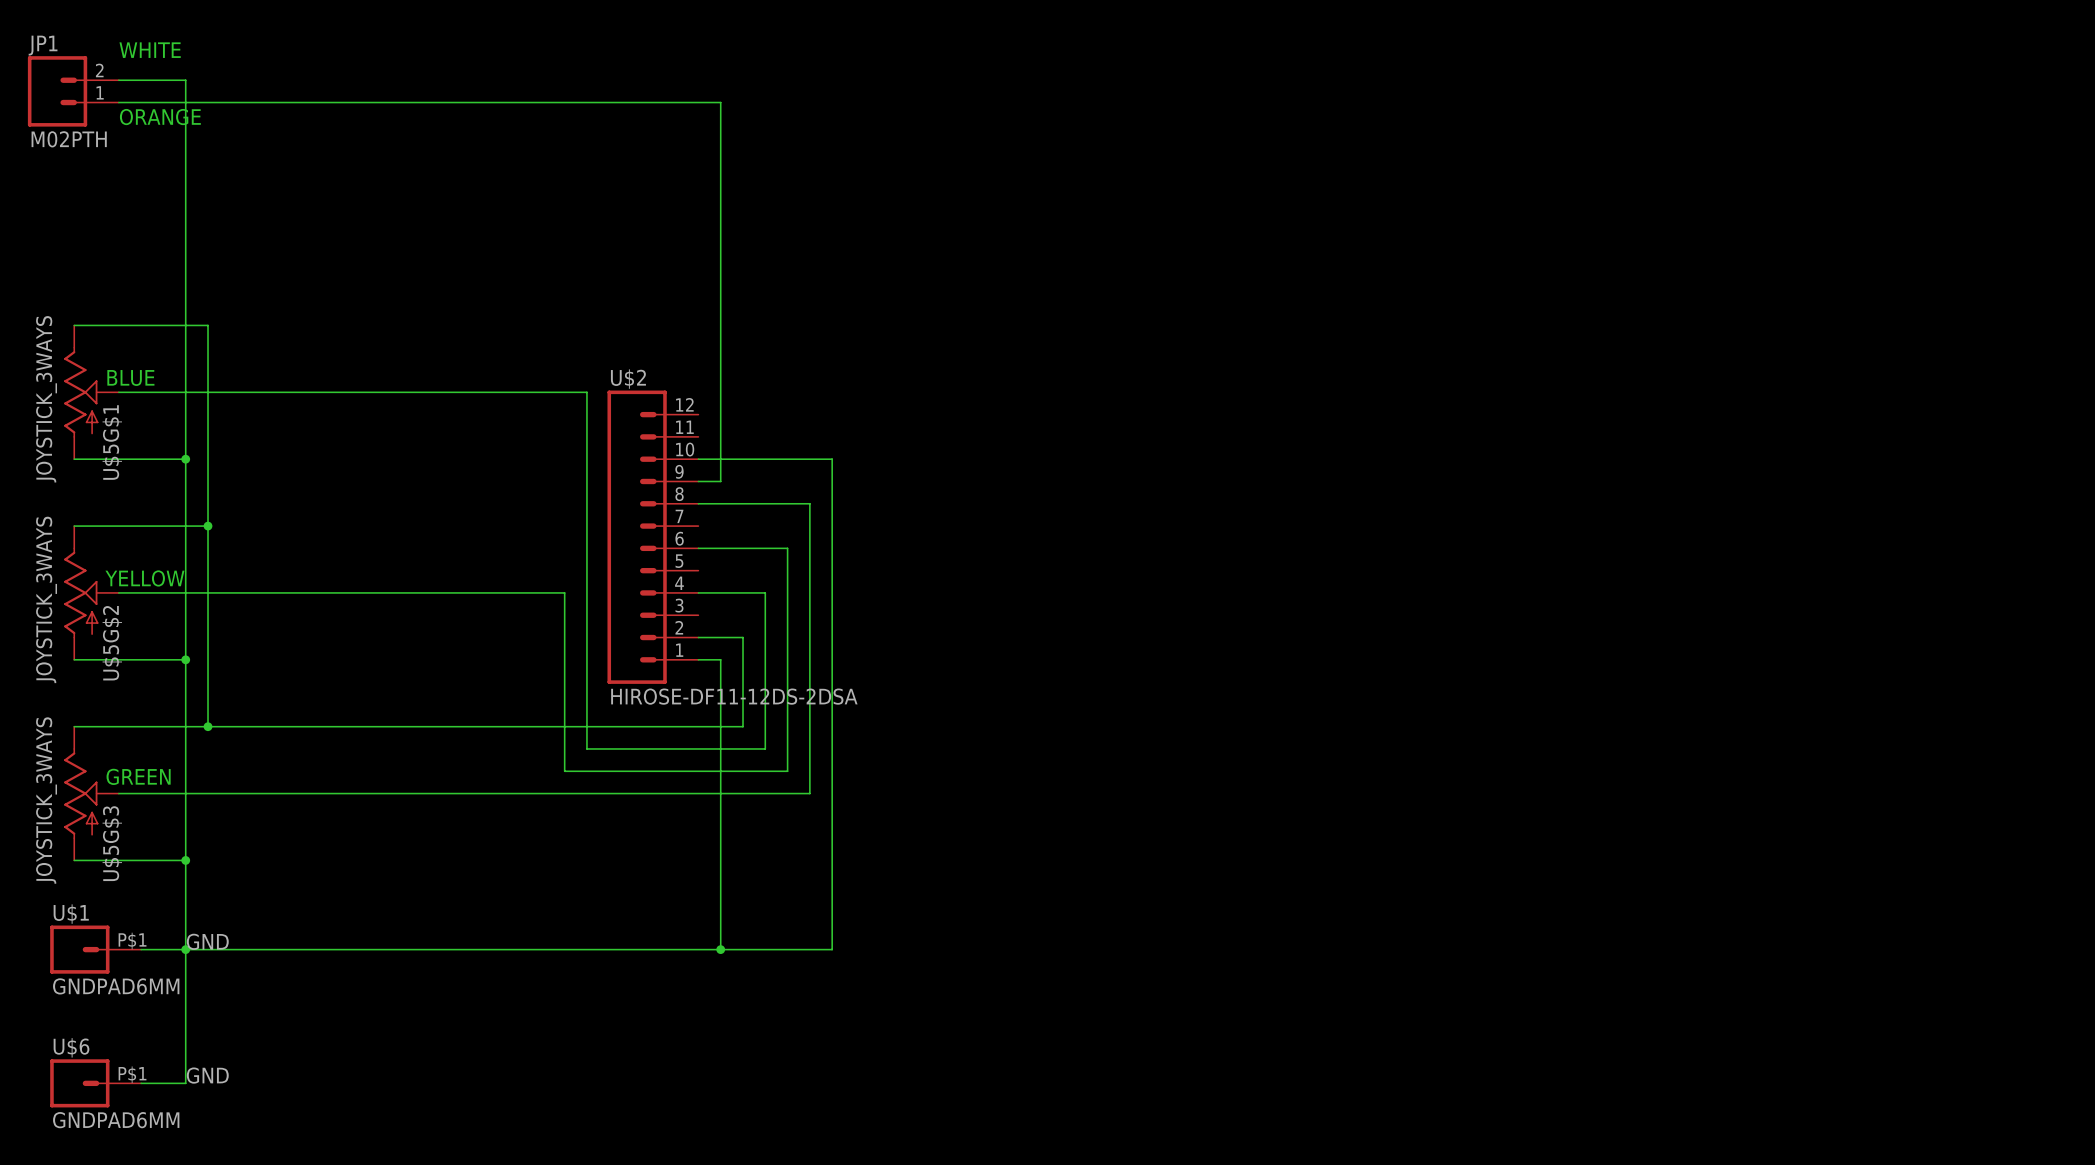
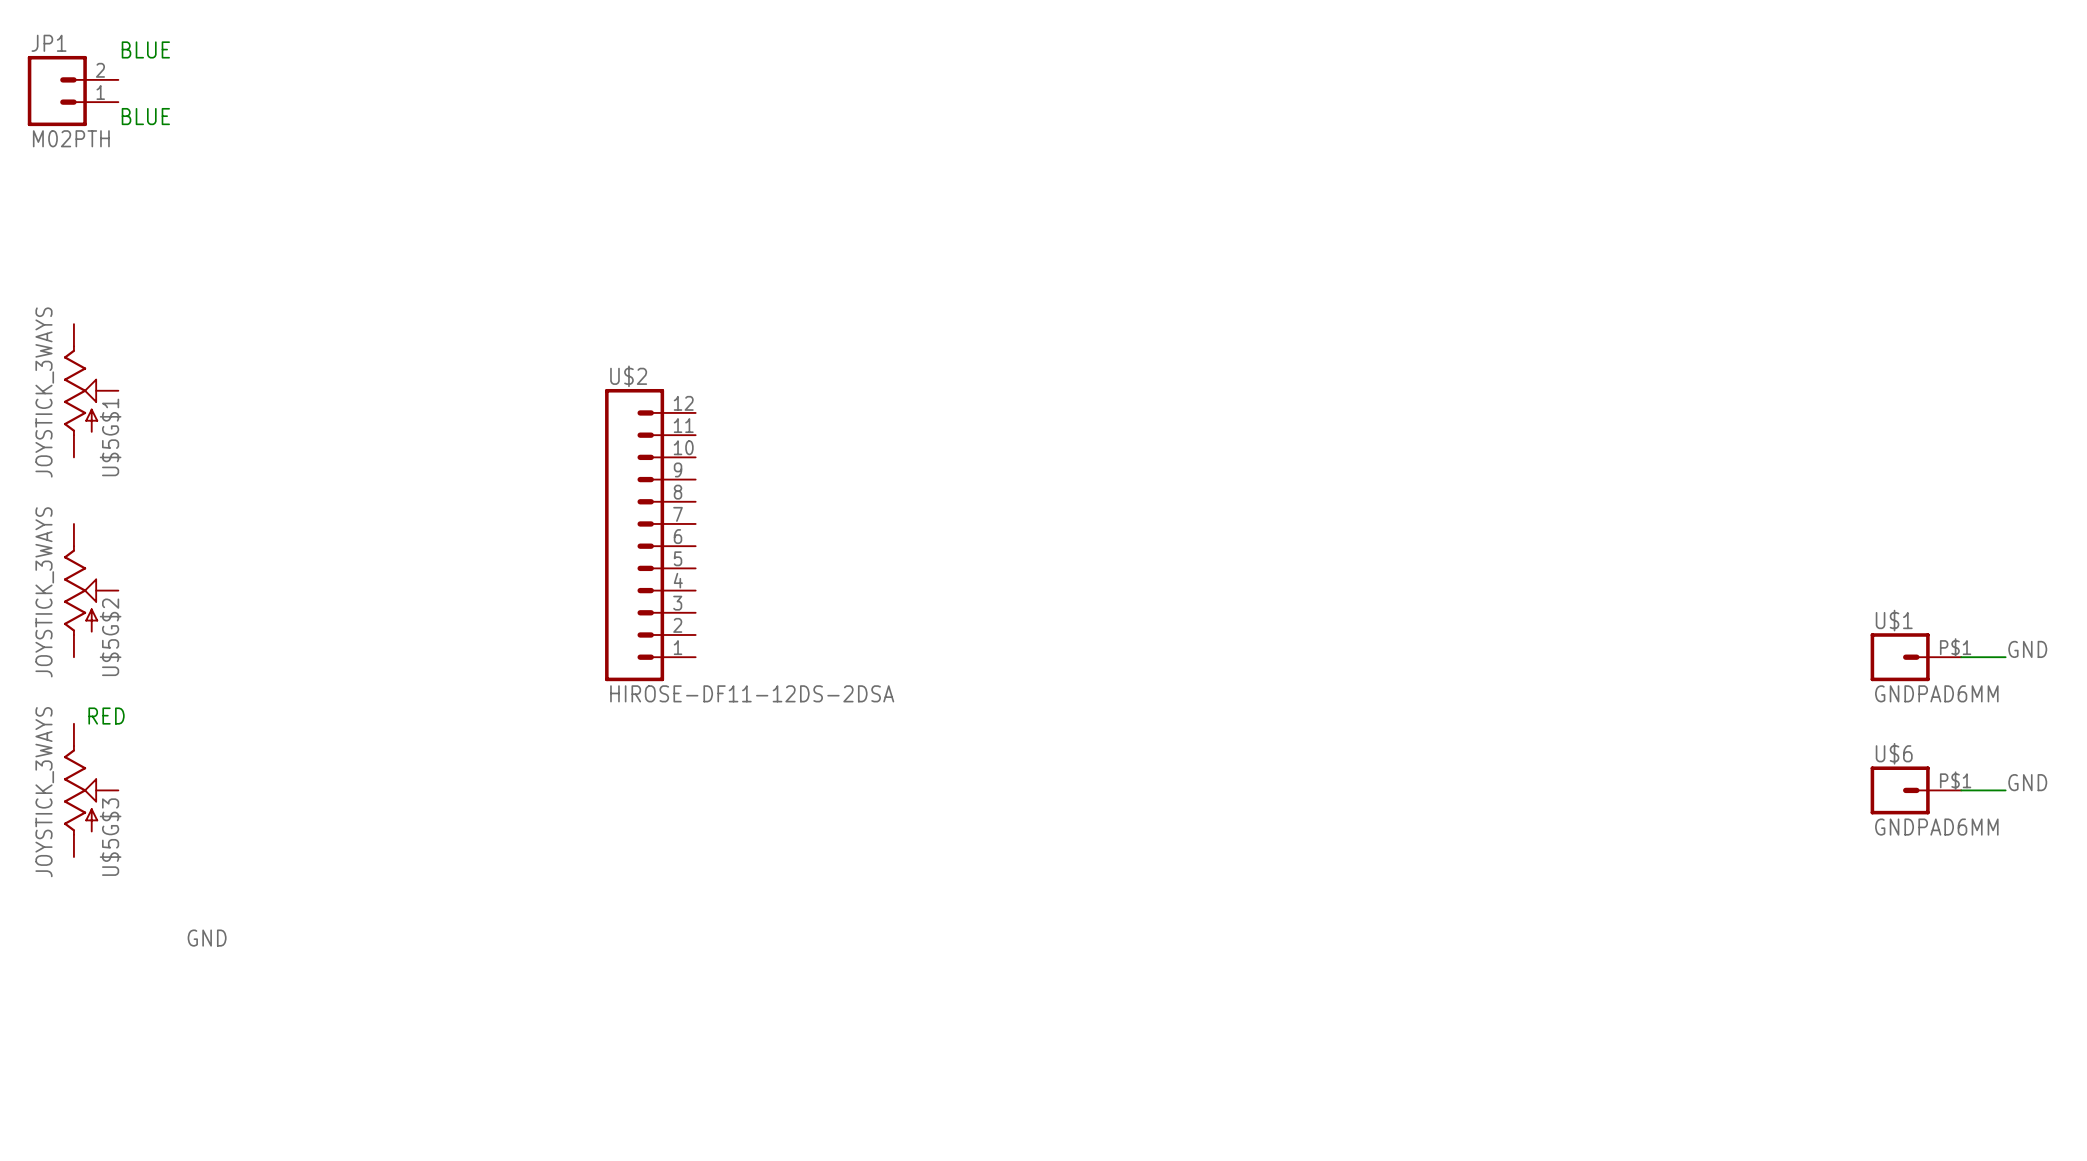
text: WHITE (150, 50) -> BLUE (145, 49)
wire: (118, 80) (185, 80) (185, 1083) (141, 1083) -> none
wire: (118, 102) (720, 102) (720, 481) (698, 481) -> none
text: ORANGE (160, 117) -> BLUE (145, 116)
wire: (74, 325) (208, 325) (208, 726) -> none
text: BLUE (130, 377) -> none
wire: (118, 392) (586, 392) (586, 748) (765, 748) (765, 592) (698, 592) -> none
wire: (74, 459) (185, 459) -> none
junction: (185, 459) -> none
wire: (698, 459) (832, 459) (832, 949) (141, 949) -> none
wire: (698, 503) (809, 503) (809, 793) (118, 793) -> none
wire: (74, 526) (208, 526) -> none
junction: (208, 526) -> none
wire: (698, 548) (787, 548) (787, 771) (564, 771) (564, 592) (118, 592) -> none
text: YELLOW (144, 578) -> none
wire: (698, 637) (743, 637) (743, 726) (74, 726) -> none
label: none -> GND (2027, 649)
wire: (74, 659) (185, 659) -> none
junction: (185, 659) -> none
wire: (698, 659) (720, 659) (720, 949) -> none
wire: none -> (1961, 657) (2005, 657)
text: none -> RED (106, 716)
junction: (208, 726) -> none
text: GREEN (138, 776) -> none
label: none -> GND (2027, 782)
wire: none -> (1961, 790) (2005, 790)
wire: (74, 860) (185, 860) -> none
junction: (185, 860) -> none
U$1 position: (95, 949) -> (1915, 657)
junction: (185, 949) -> none
junction: (720, 949) -> none
label: GND (207, 1075) -> none
U$6 position: (95, 1083) -> (1915, 790)

